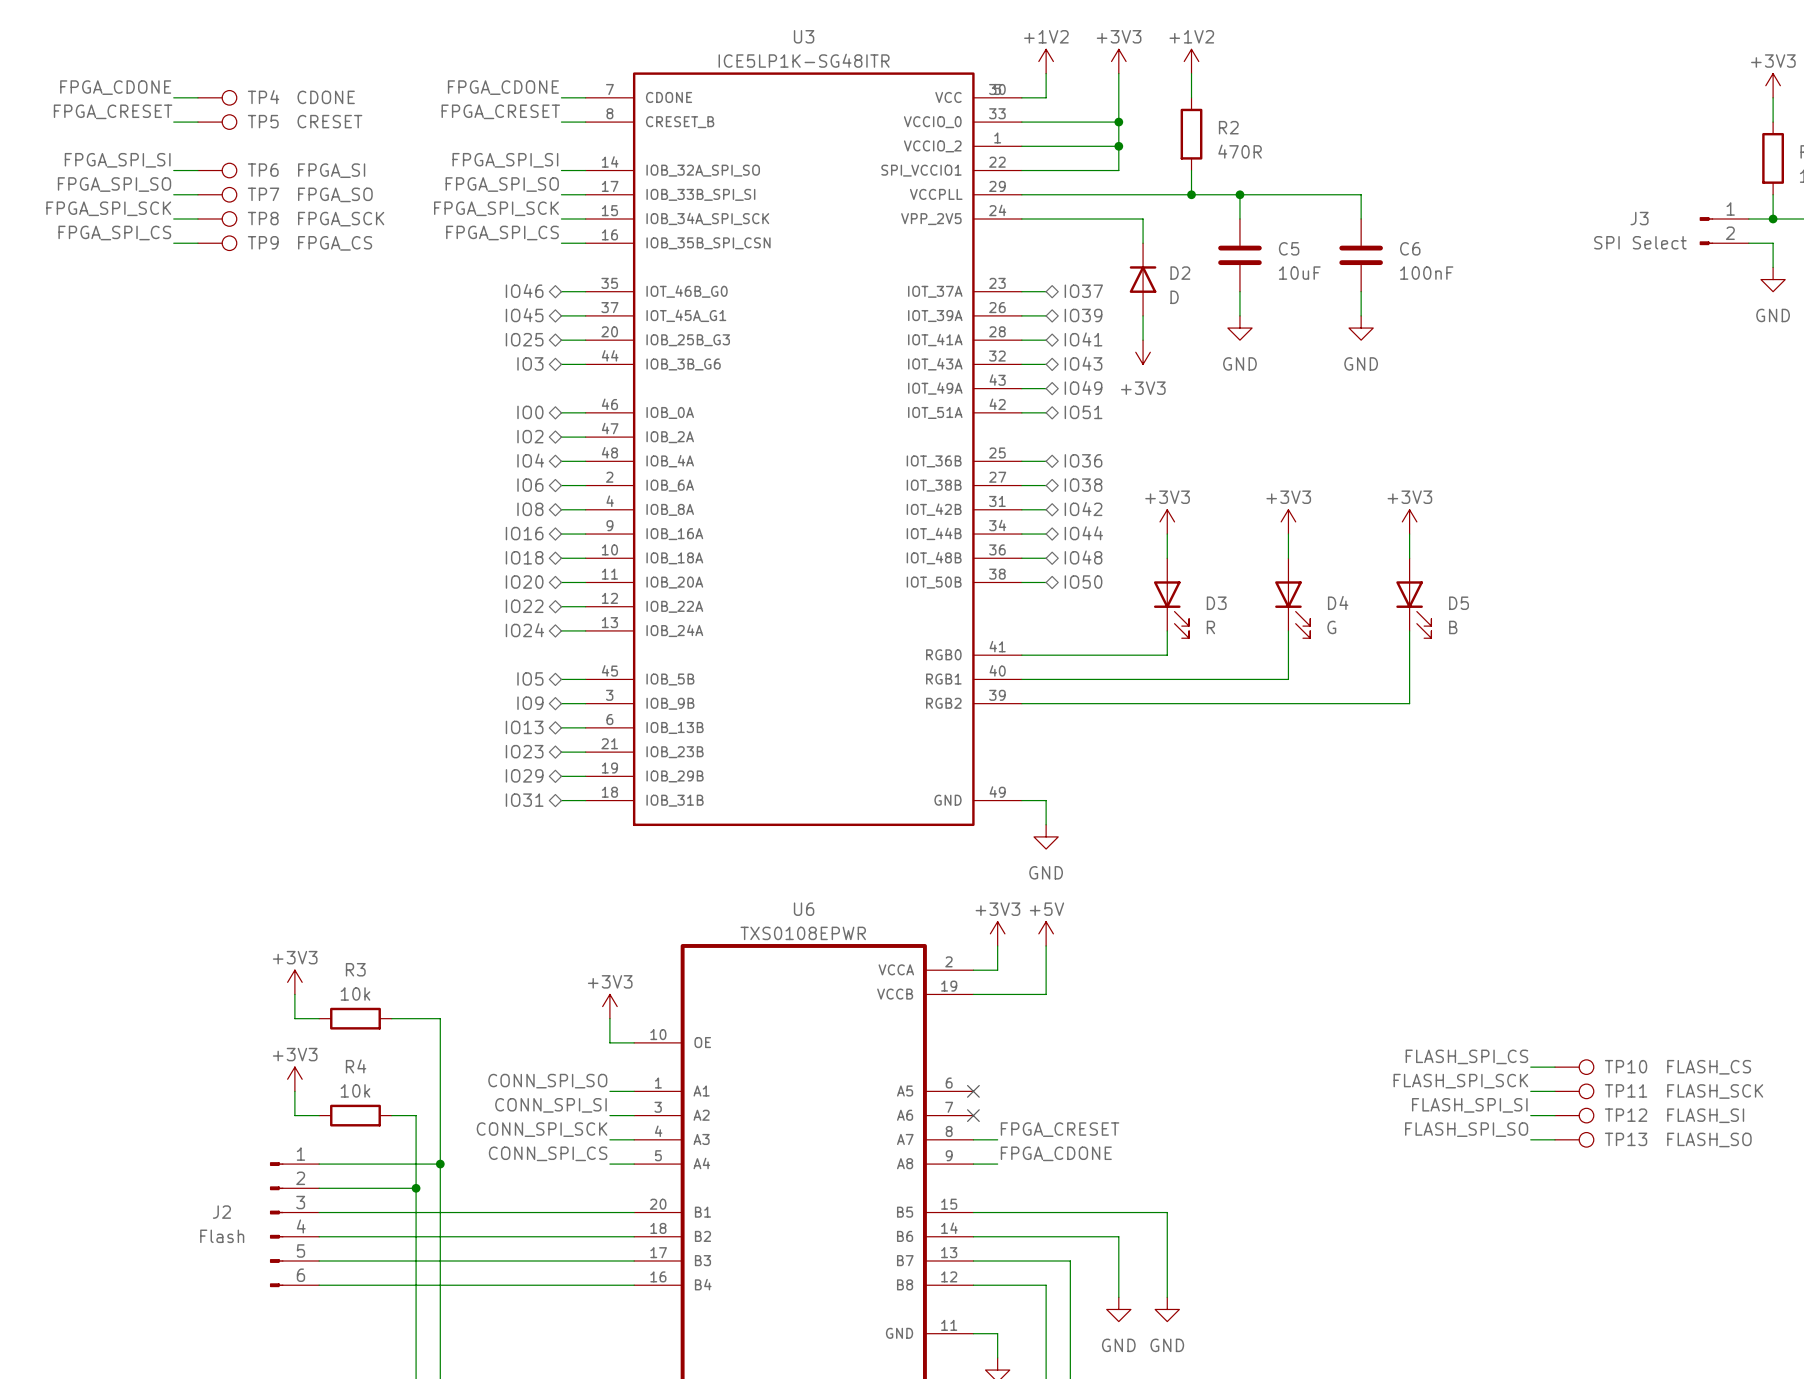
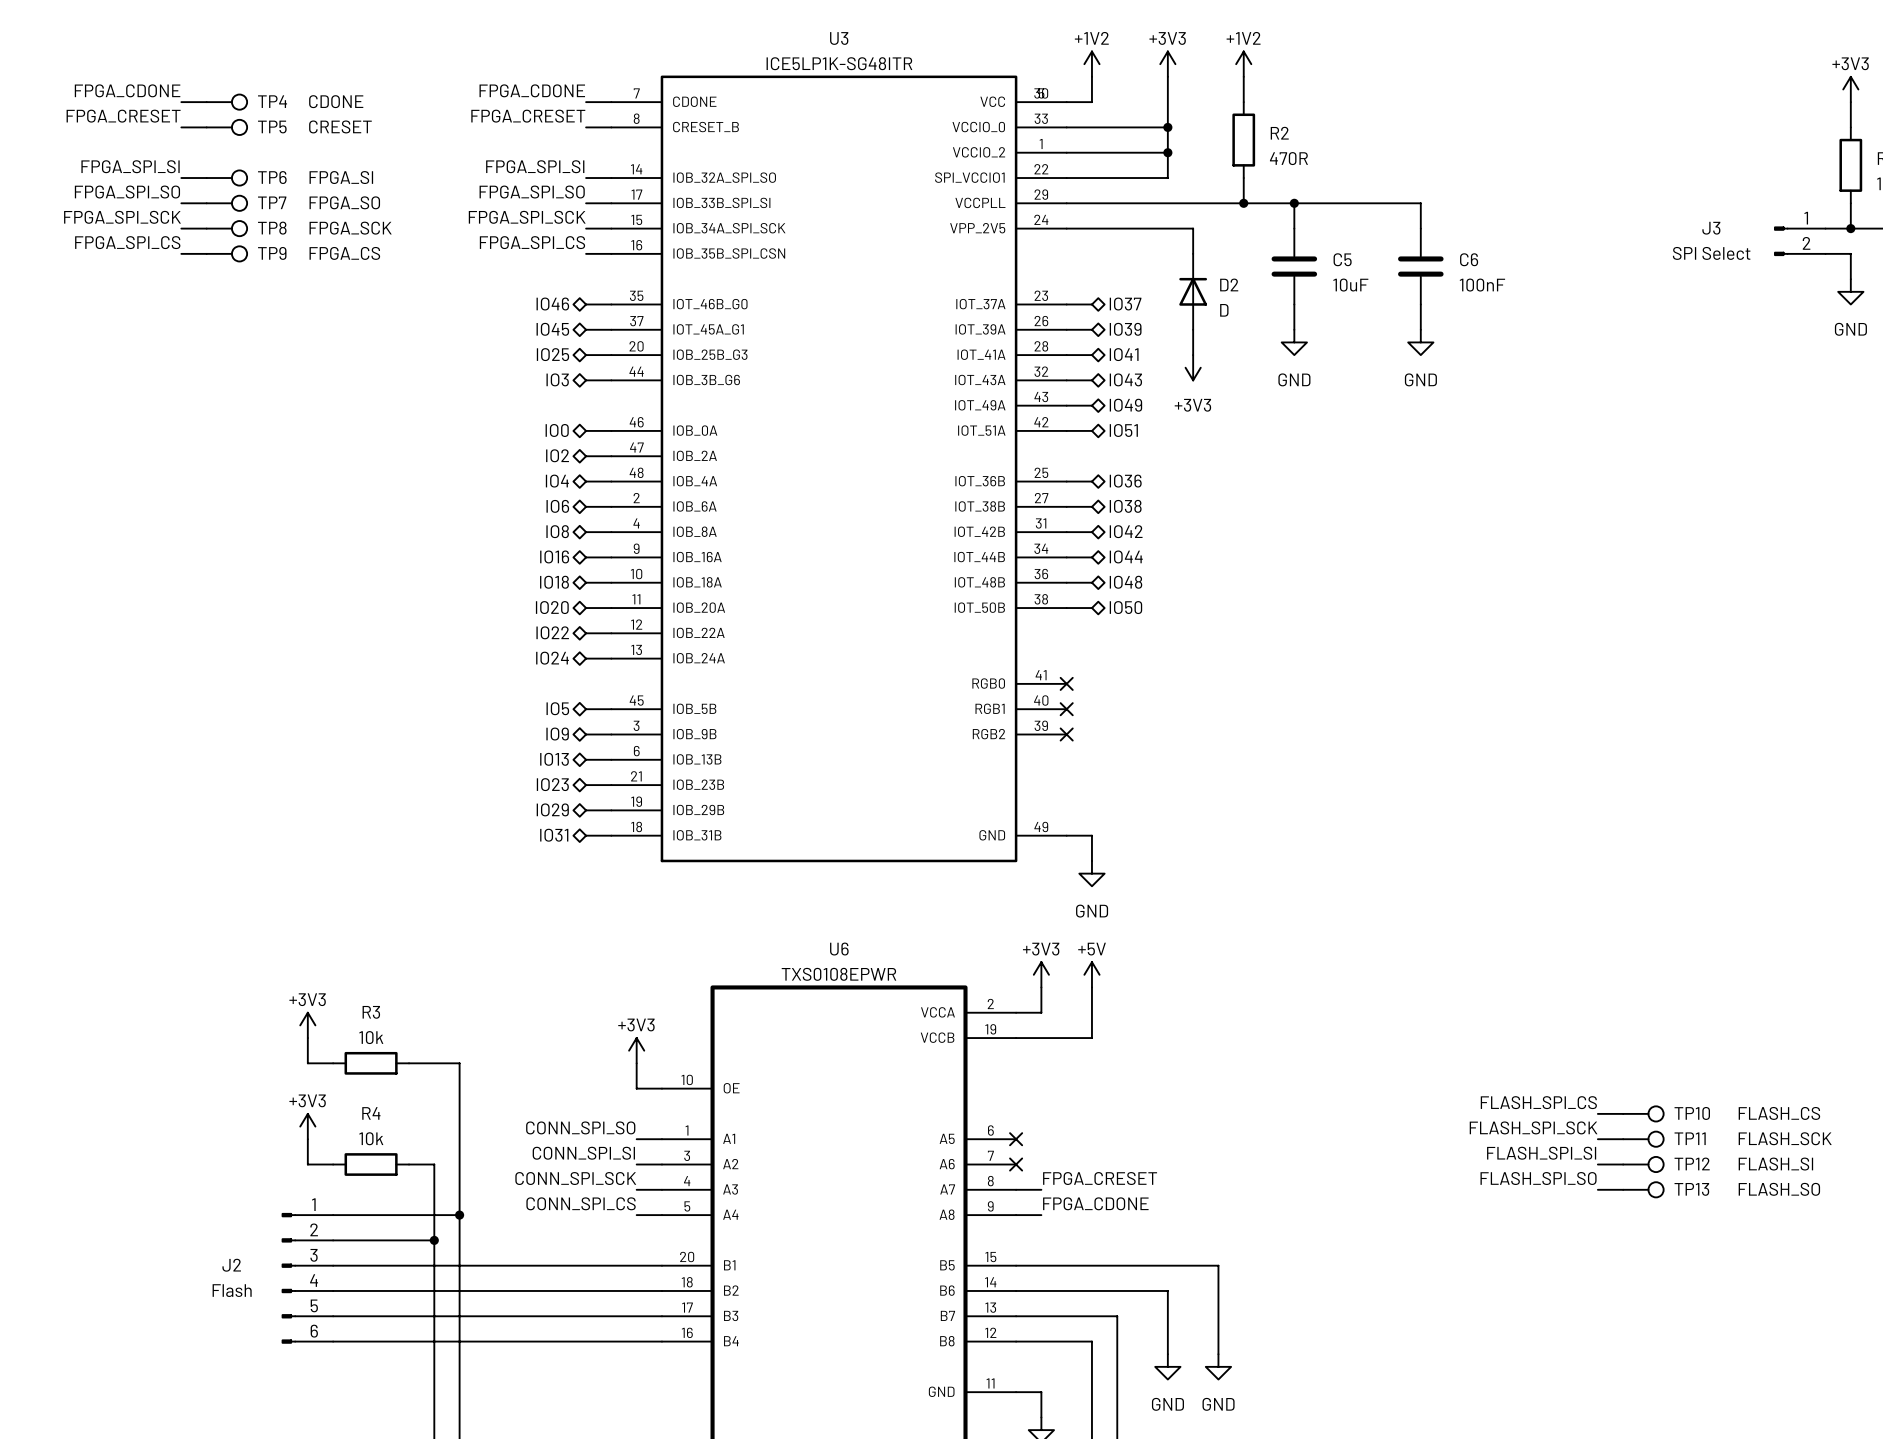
power symbol: +3V3 (1167, 521) -> none
power symbol: +3V3 (1288, 521) -> none
power symbol: +3V3 (1409, 521) -> none
wire: (1167, 534) (1167, 558) -> none
wire: (1288, 534) (1288, 558) -> none
wire: (1409, 534) (1409, 558) -> none
D3: R (1171, 598) -> none
D4: G (1292, 598) -> none
D5: B (1413, 598) -> none
wire: (1167, 630) (1167, 655) (1021, 655) -> none
wire: (1288, 630) (1288, 679) (1021, 679) -> none
wire: (1409, 630) (1409, 703) (1021, 703) -> none
no-connect mark: none -> (1066, 683)
no-connect mark: none -> (1066, 709)
no-connect mark: none -> (1066, 734)

